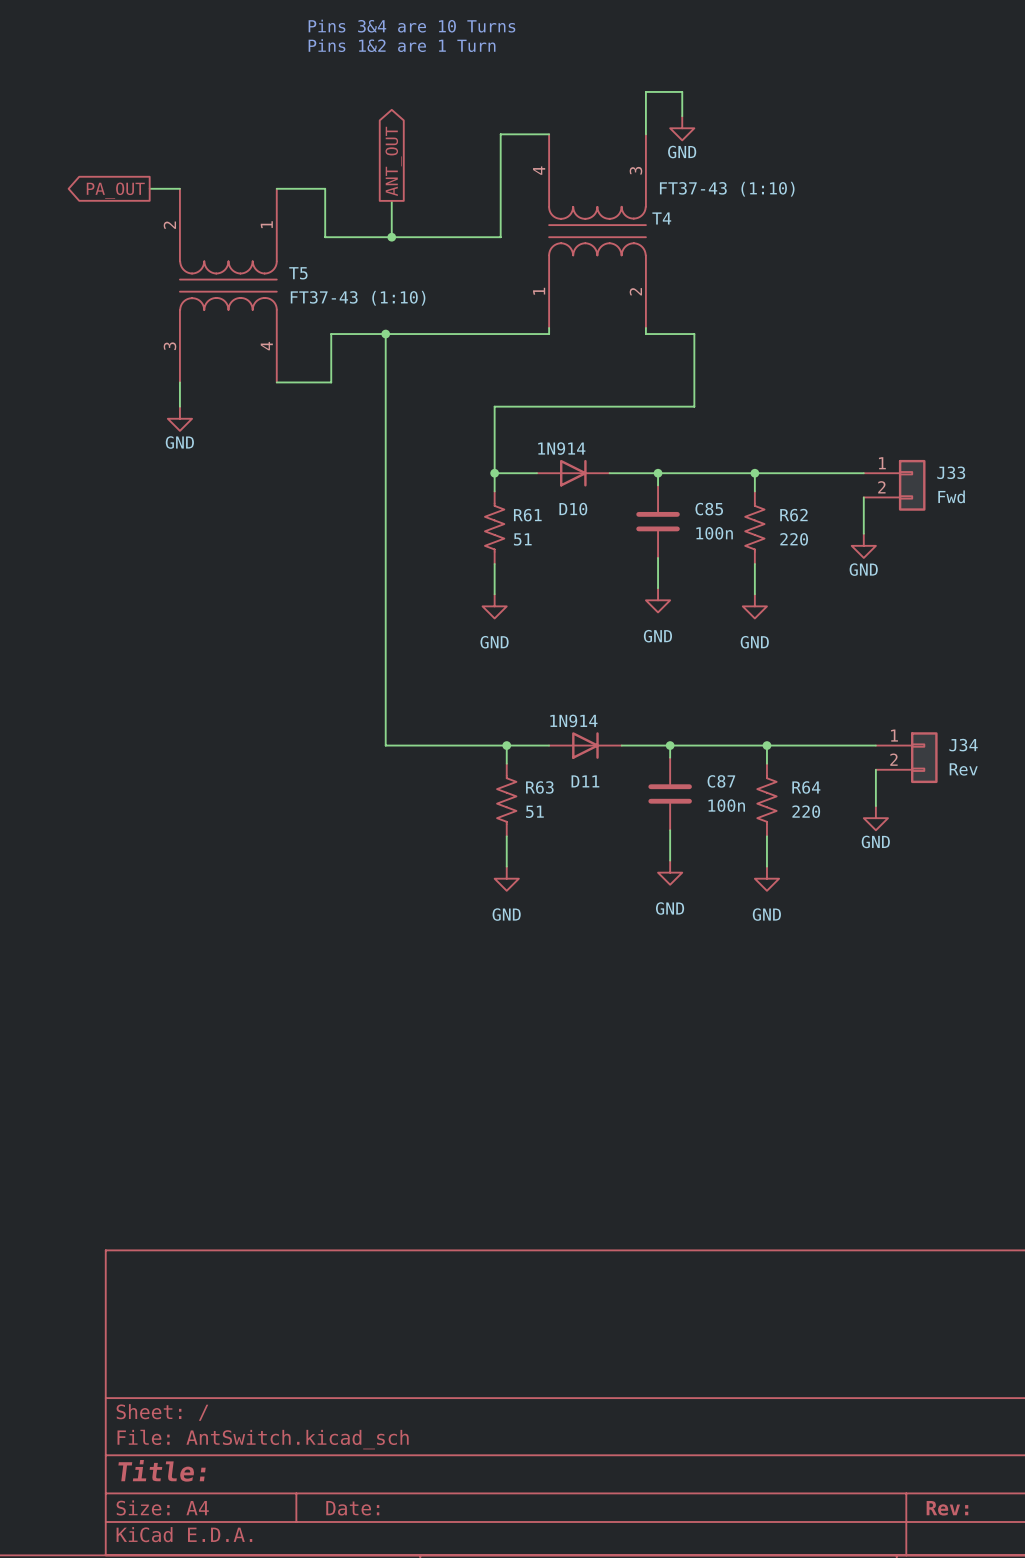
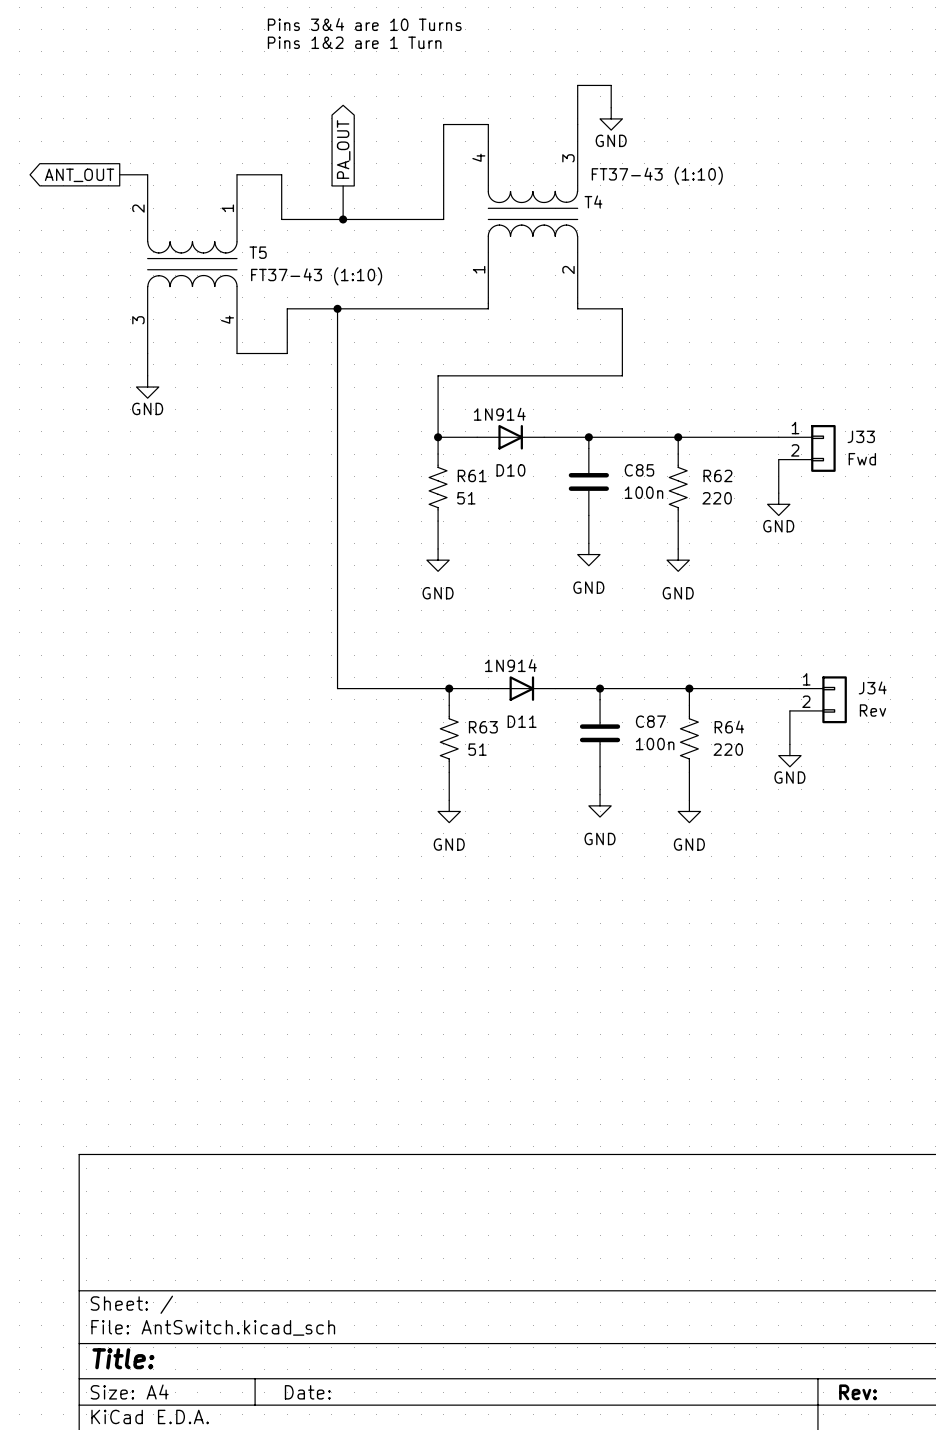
global label: ANT_OUT (393, 161) -> PA_OUT (343, 149)
global label: PA_OUT (115, 190) -> ANT_OUT (79, 175)

